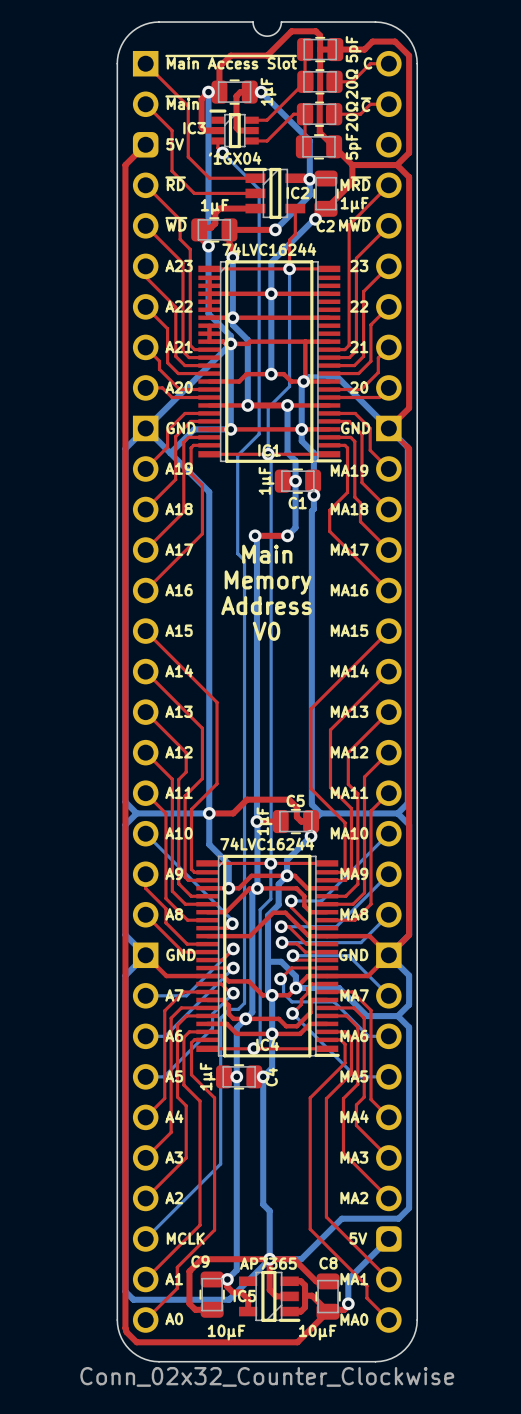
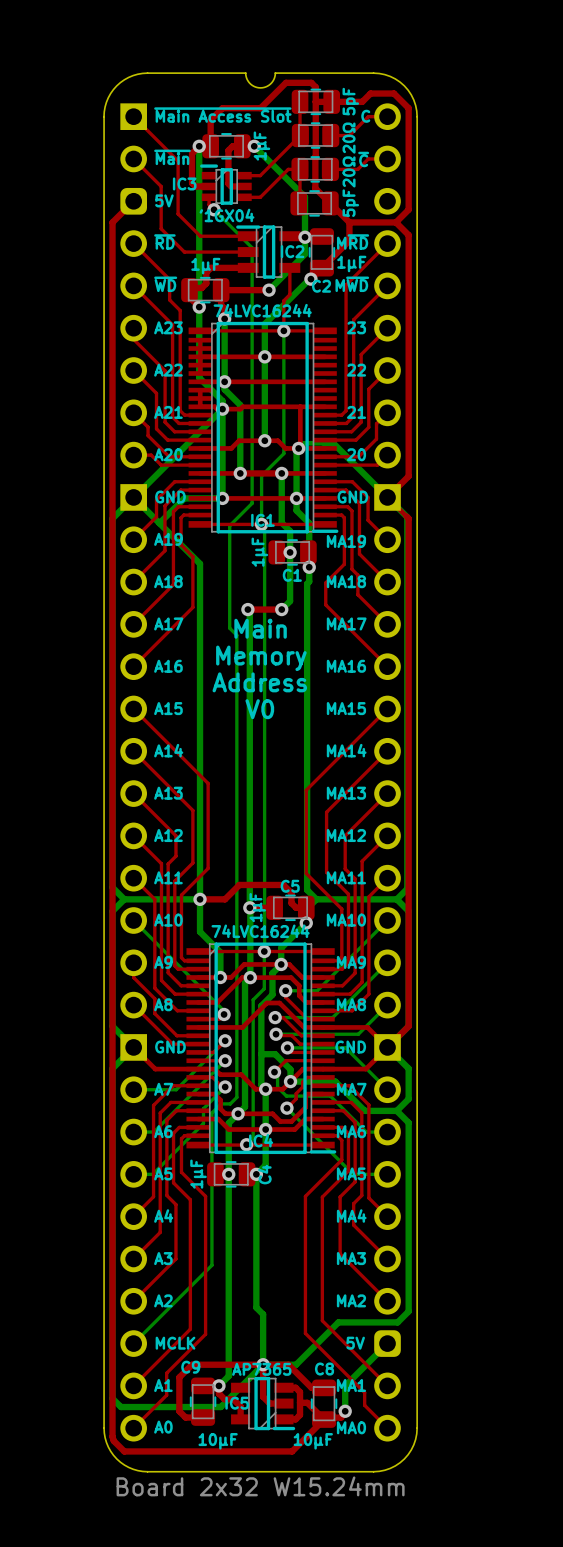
part value: Conn_02x32_Counter_Clockwise (267, 1376) -> Board 2x32 W15.24mm (260, 1486)

